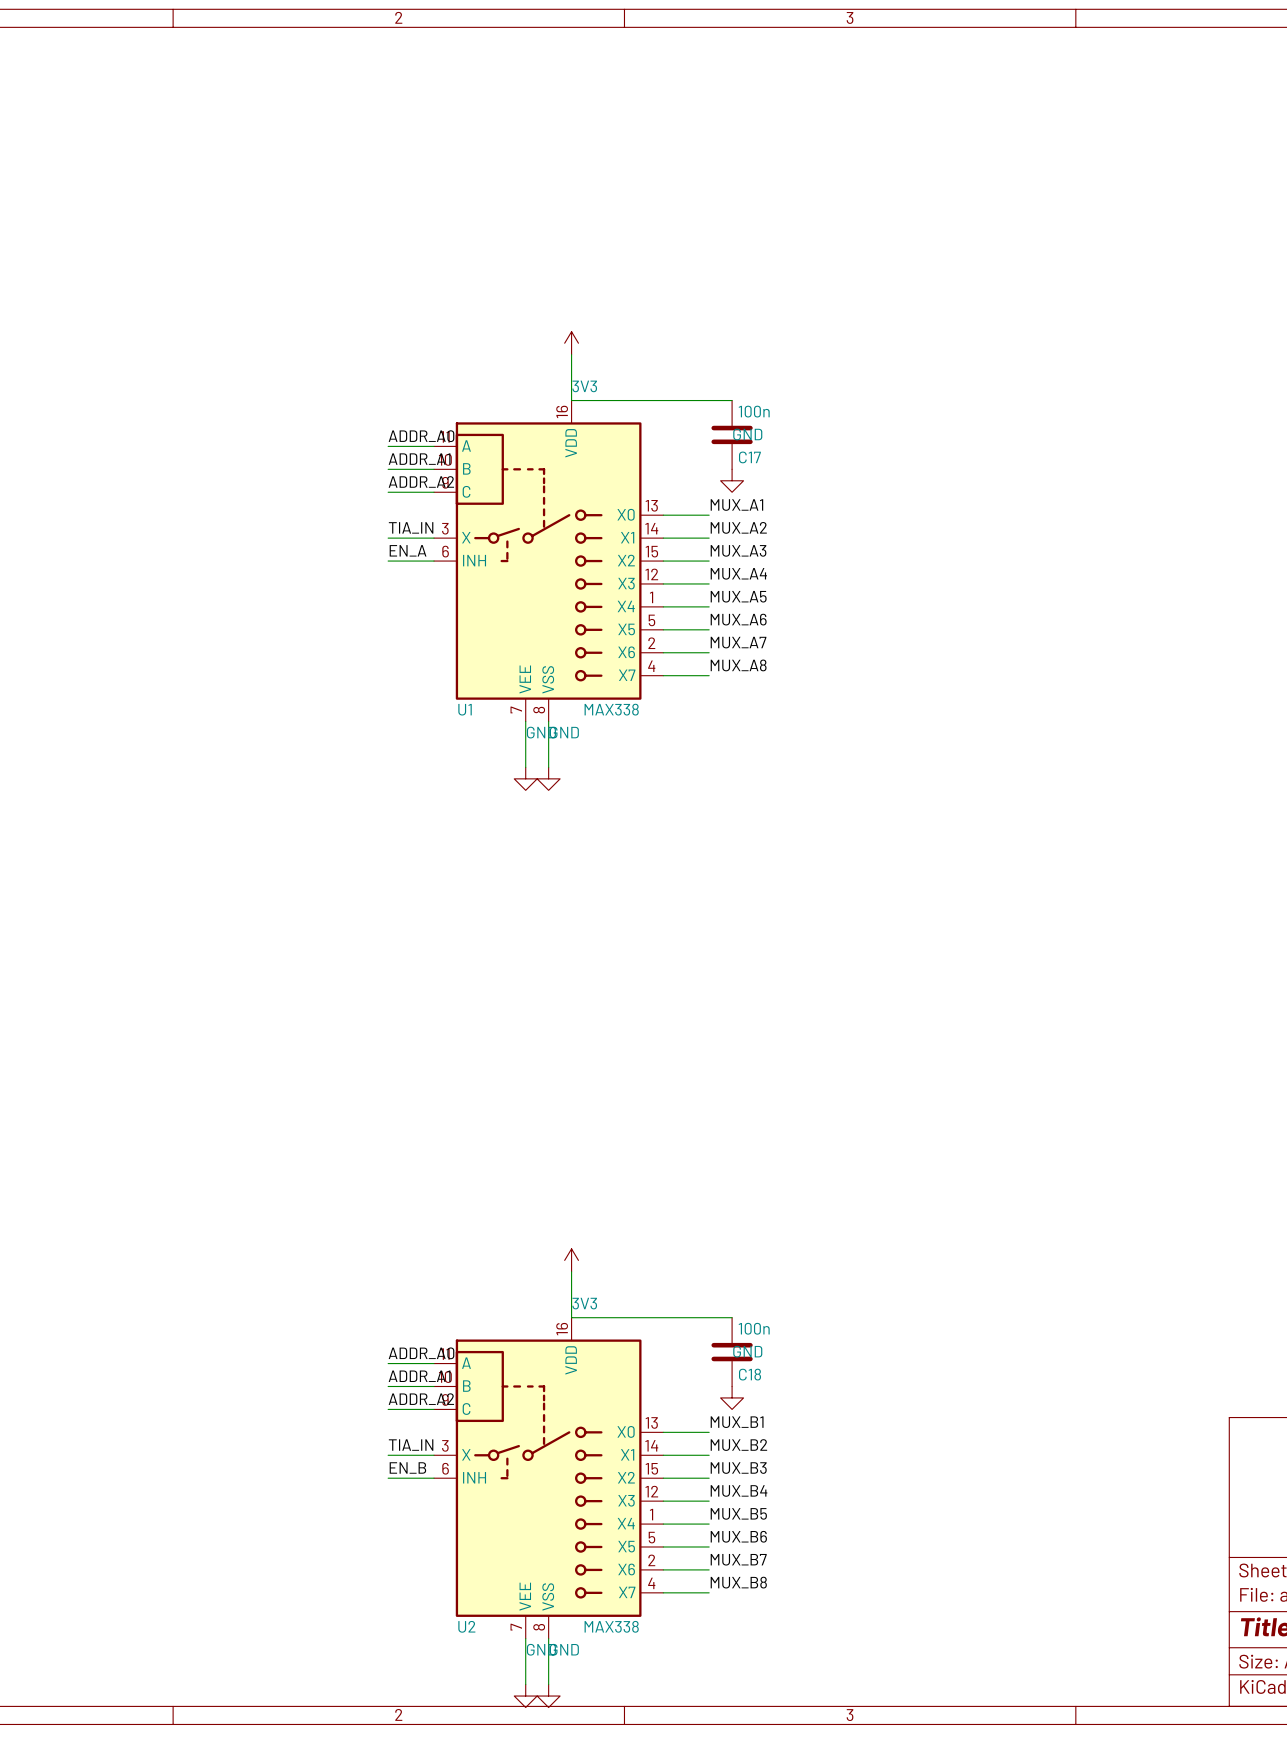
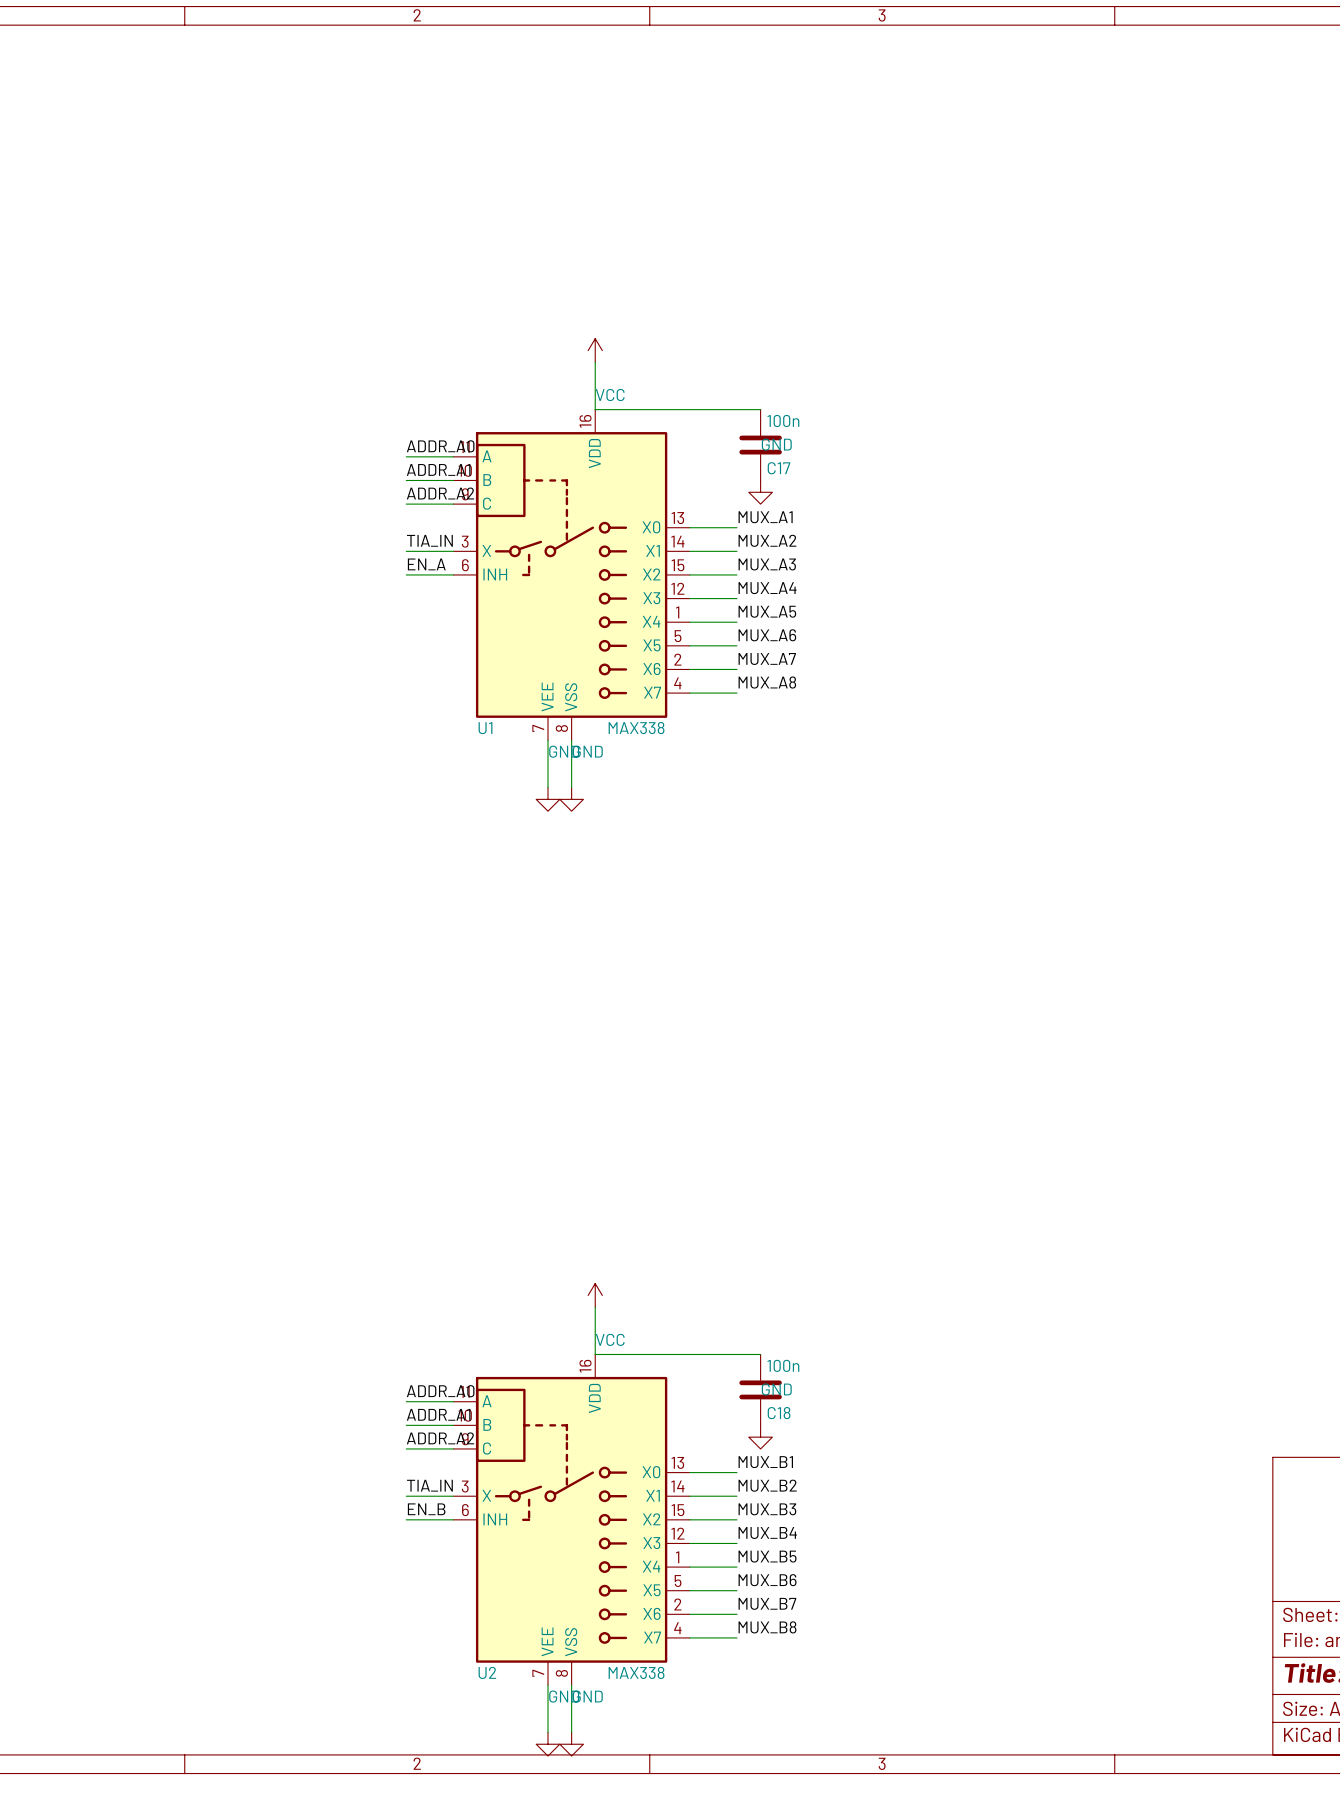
power symbol: 3V3 (571, 343) -> VCC (595, 350)
power symbol: 3V3 (571, 1260) -> VCC (595, 1295)

